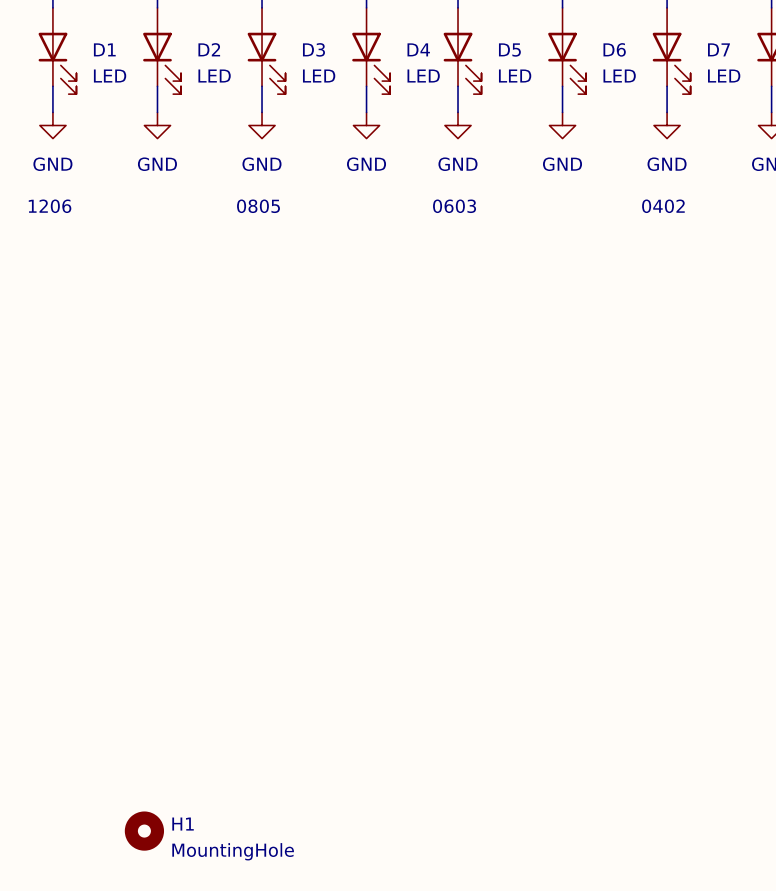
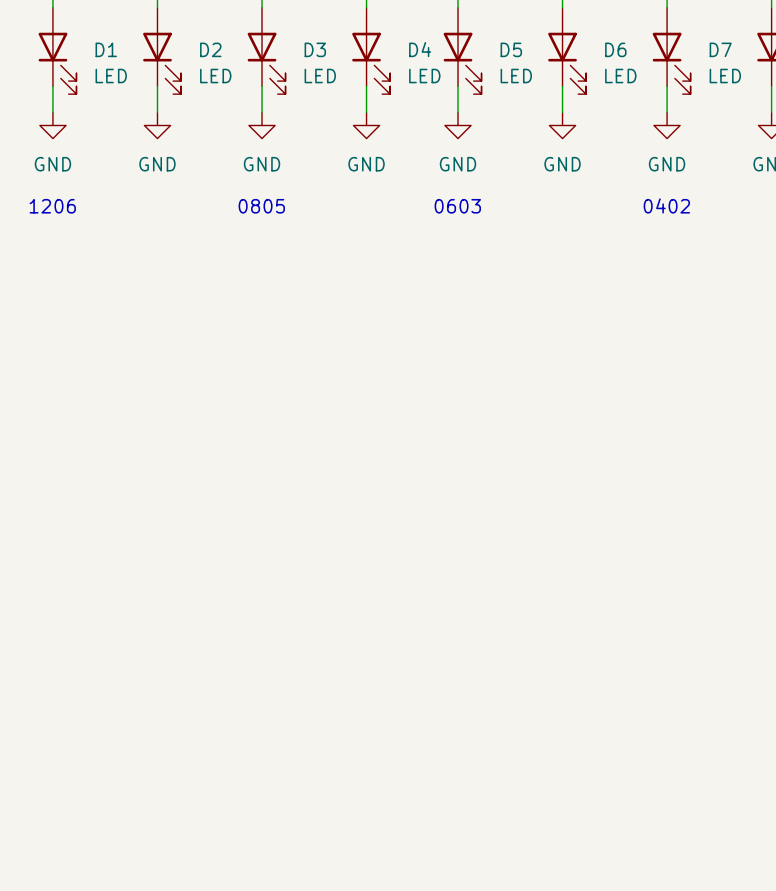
H1: MountingHole (144, 831) -> none

